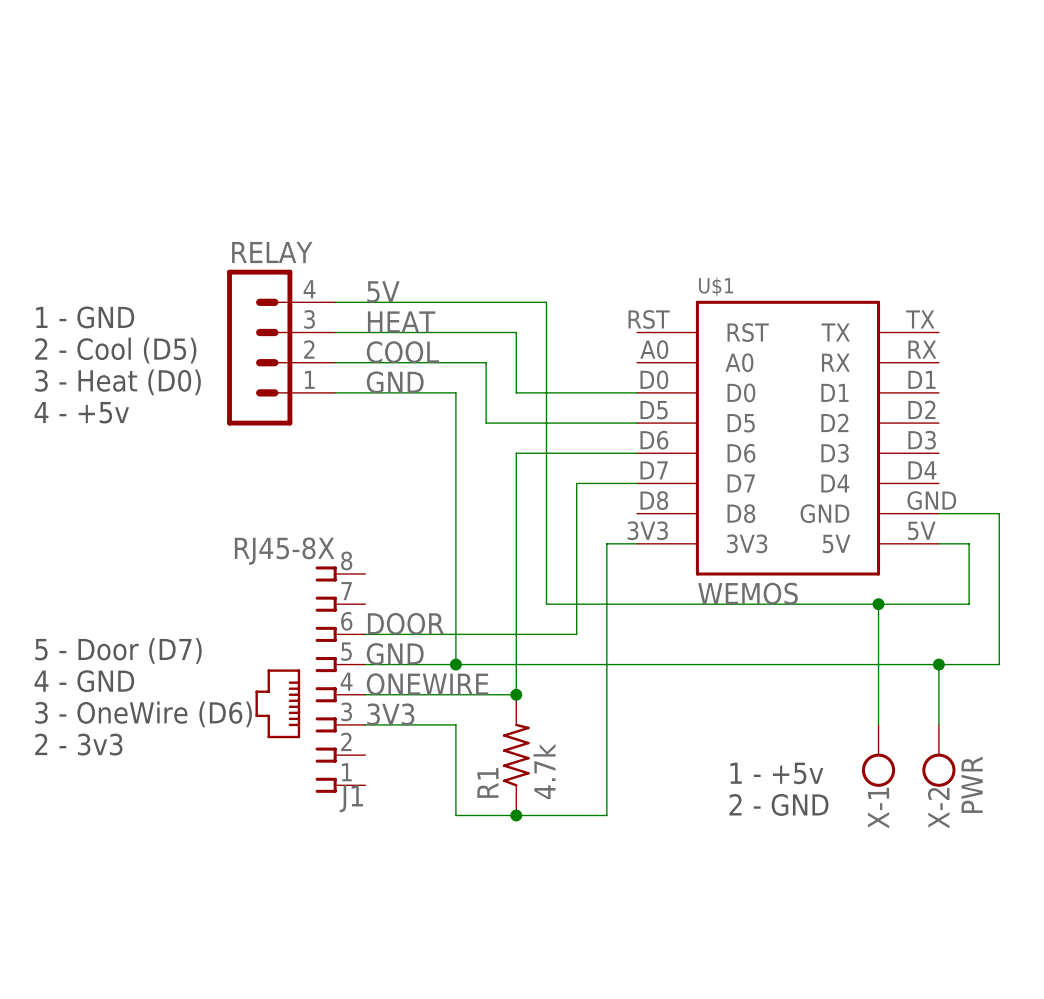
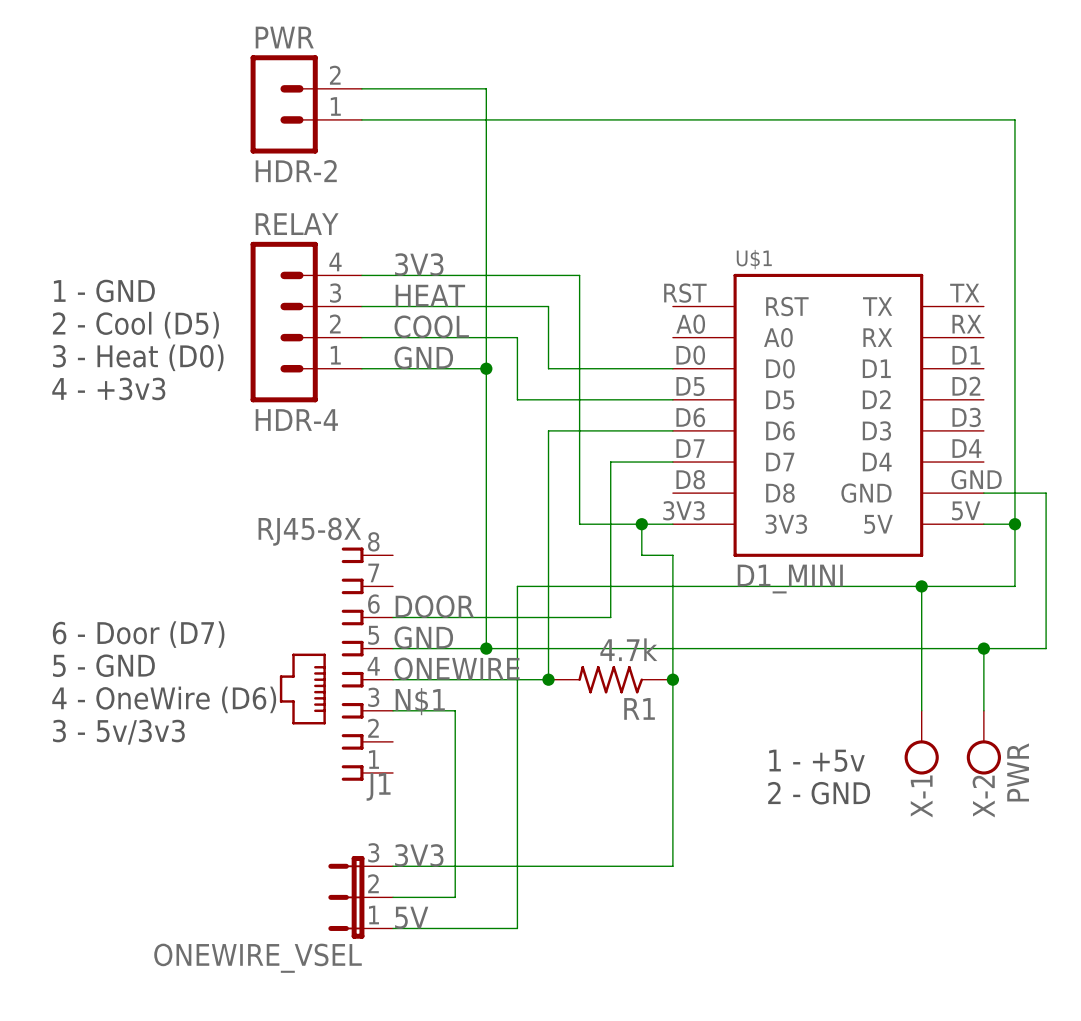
wire: none -> (361, 88) (486, 88) (486, 368)
PWR: none -> HDR-2 (306, 104)
wire: none -> (361, 119) (1014, 119) (1014, 524)
label: 5V (383, 291) -> 3V3 (419, 264)
junction: none -> (486, 368)
text: 4 - +5v (81, 412) -> 4 - +3v3 (108, 388)
RELAY value: none -> HDR-4 (296, 420)
wire: (546, 543) (546, 604) -> (579, 524) (641, 524)
junction: none -> (641, 524)
junction: none -> (1014, 524)
wire: (606, 574) (606, 815) (455, 815) (455, 724) (425, 724) -> (641, 555) (672, 555) (672, 866) (393, 866)
U$1 value: WEMOS (748, 593) -> D1_MINI (790, 579)
wire: none -> (579, 586) (517, 586) (517, 928) (393, 928)
text: 5 - Door (D7) (118, 650) -> 6 - Door (D7) (138, 634)
text: 4 - GND (84, 681) -> 5 - GND (103, 665)
junction: none -> (672, 679)
text: 3 - OneWire (D6) (143, 714) -> 4 - OneWire (D6) (164, 699)
label: 3V3 (390, 714) -> N$1 (420, 701)
wire: none -> (455, 710) (455, 897) (393, 897)
text: 2 - 3v3 (78, 744) -> 3 - 5v/3v3 (118, 732)
R1 rotation: 0° (516, 755) -> 90° counterclockwise (610, 679)
R1 position: (516, 755) -> (610, 679)
junction: (516, 815) -> none
label: none -> 3V3 (419, 855)
ONEWIRE_VSEL: none -> (360, 897)
label: none -> 5V (411, 917)

